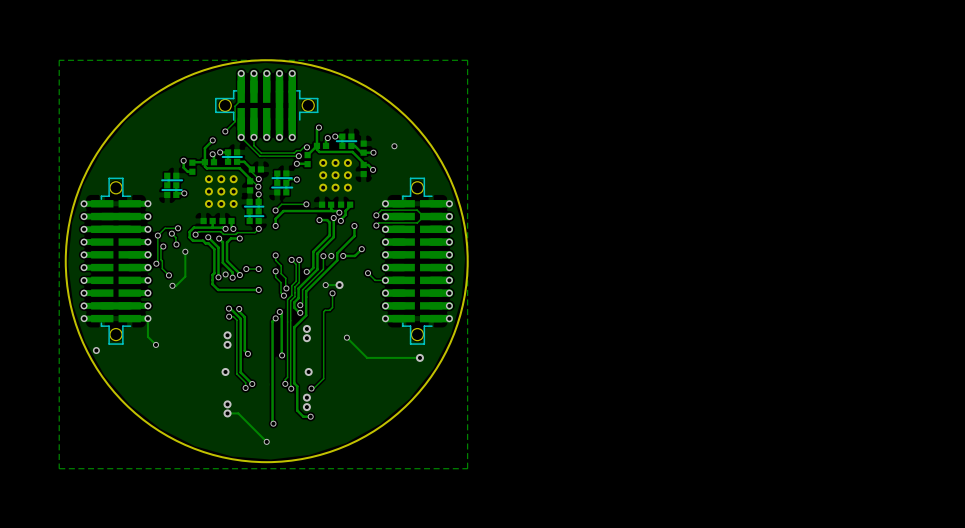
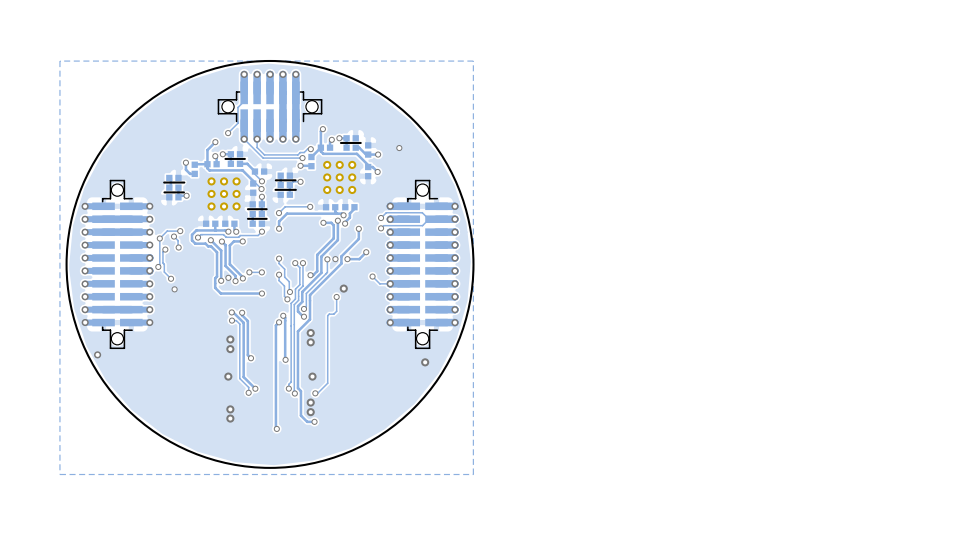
track: (185, 251) (185, 276) (176, 285) (172, 285) -> none
via: (185, 251) -> none
via: (325, 285) -> none
track: (339, 285) (325, 285) -> none
track: (147, 318) (147, 336) (155, 344) -> none
track: (346, 337) (367, 357) (419, 357) -> none
via: (346, 337) -> none
via: (155, 344) -> none
track: (227, 413) (238, 413) (266, 441) -> none
via: (266, 441) -> none

